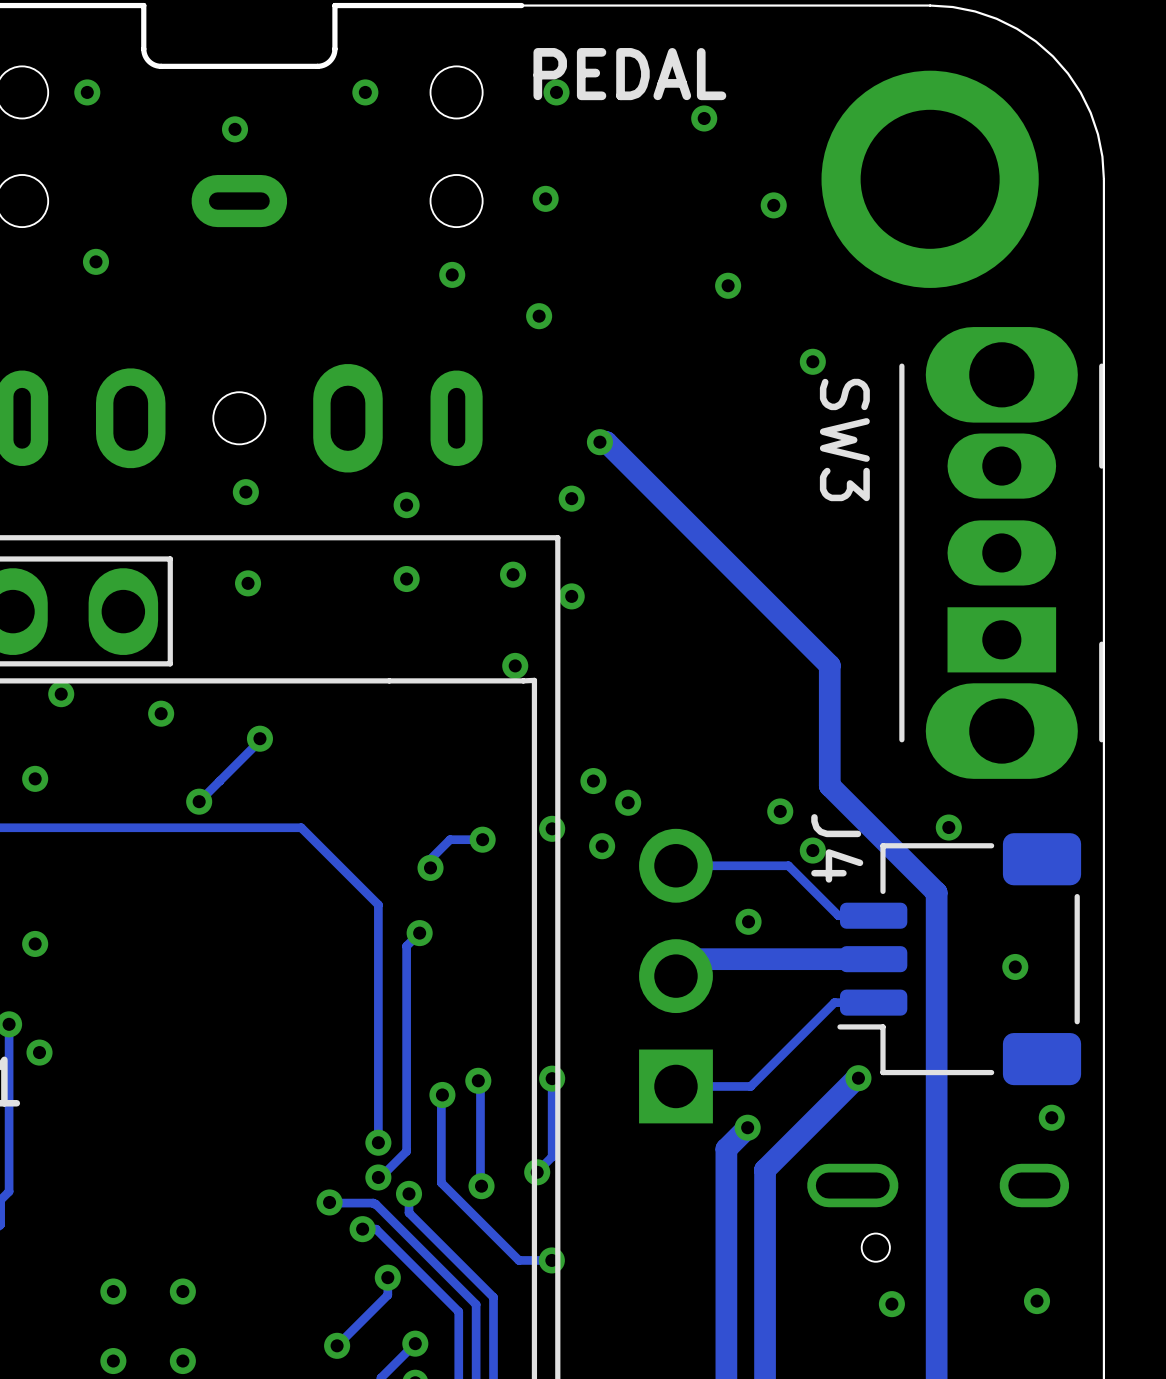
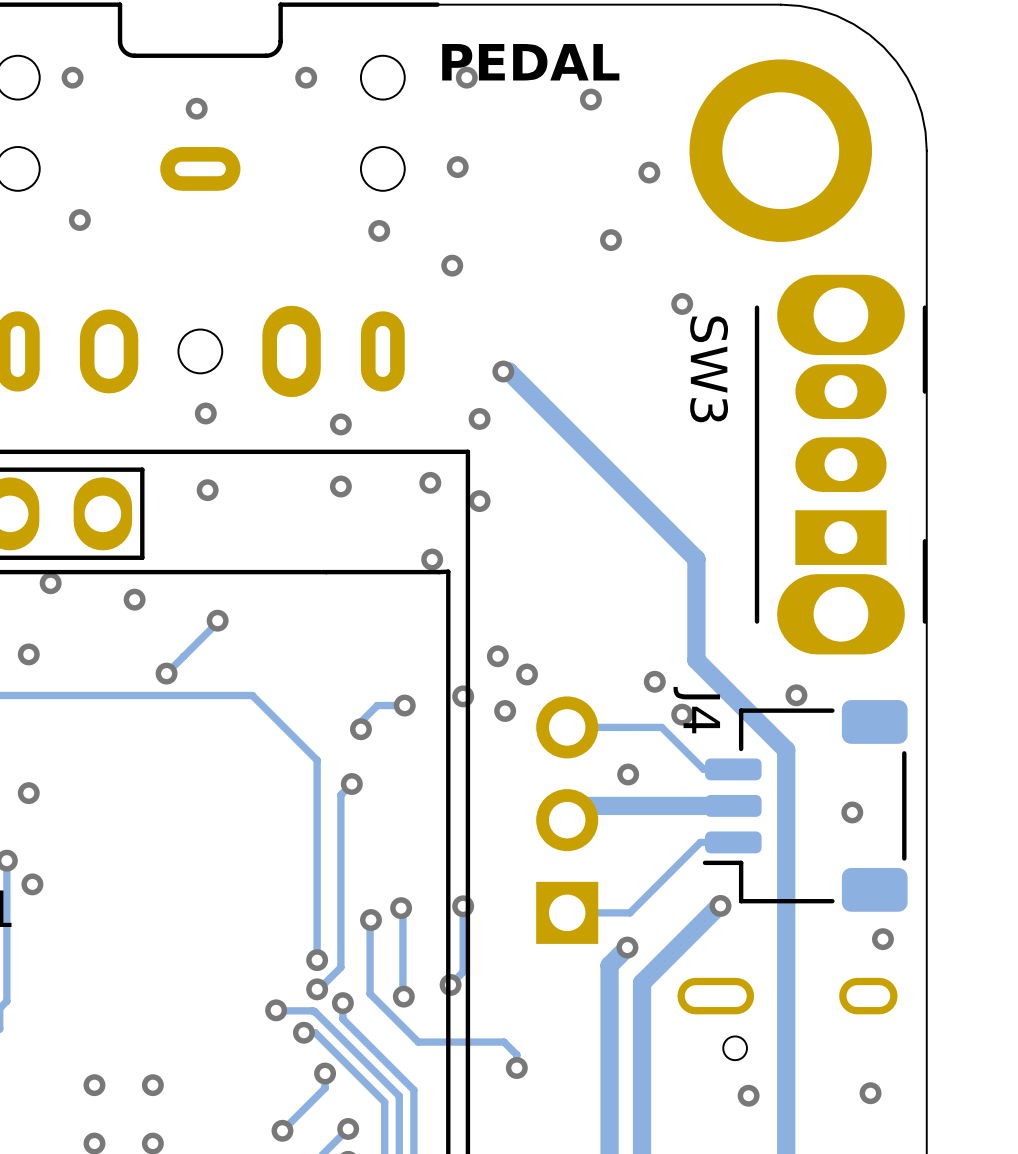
track: (498, 1240) (518, 1260) (551, 1260) -> (418, 1042) (504, 1042) (516, 1054) (516, 1068)
via position: (551, 1260) -> (516, 1068)

